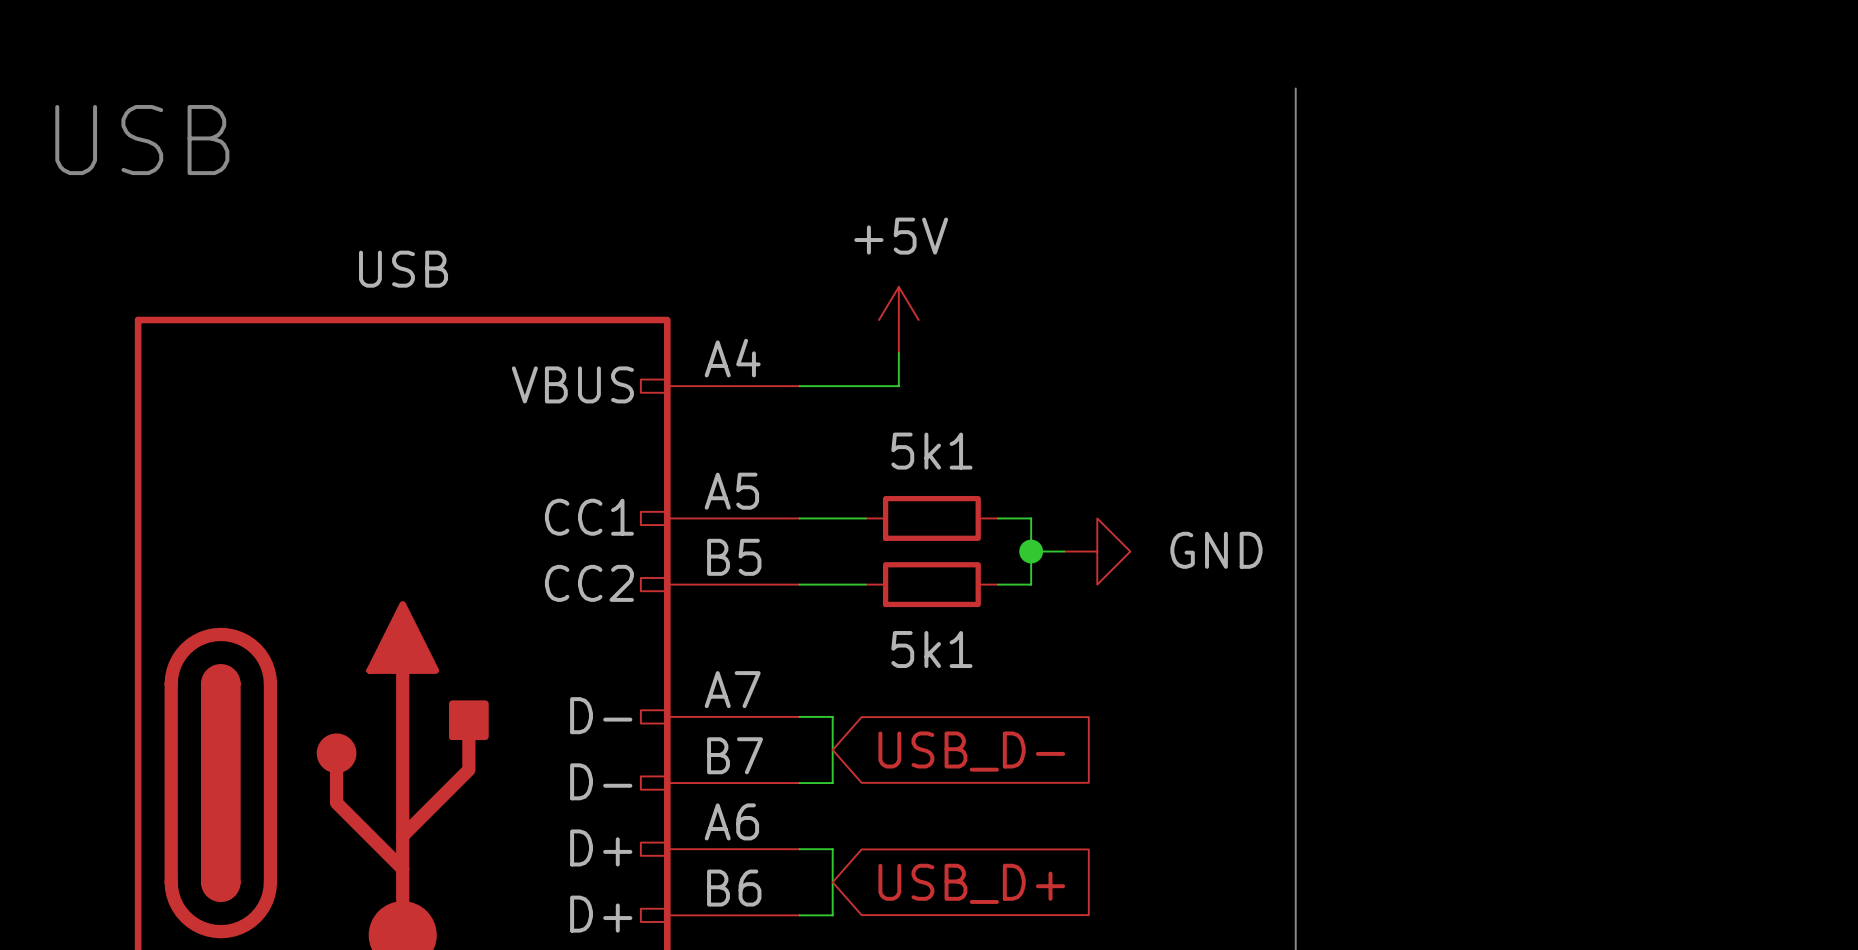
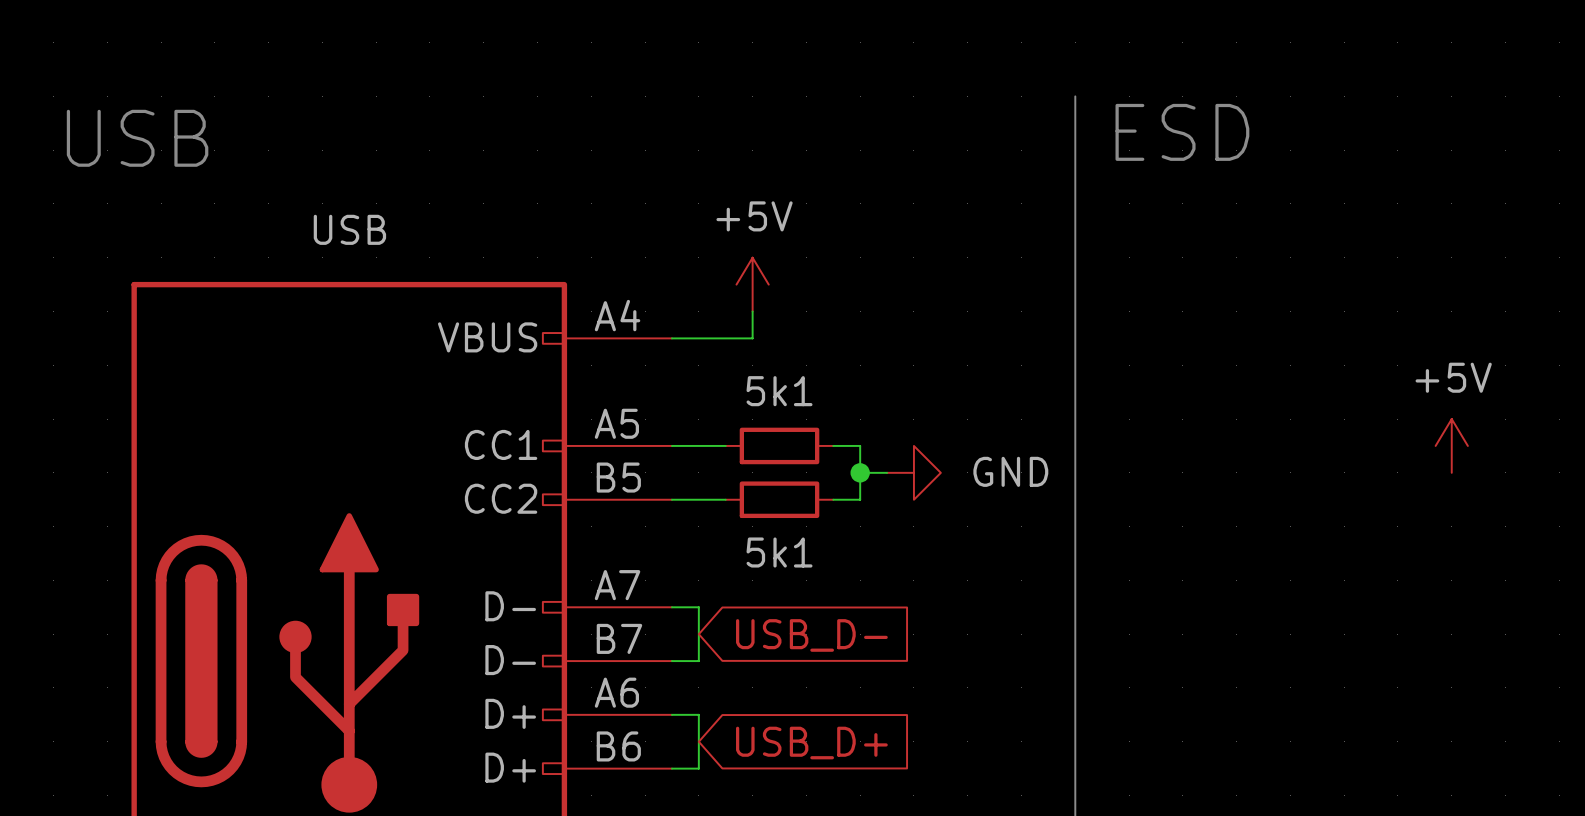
text: none -> ESD (1182, 132)
part value position: USB (403, 269) -> USB (349, 229)
power symbol: none -> +5V (1451, 445)

